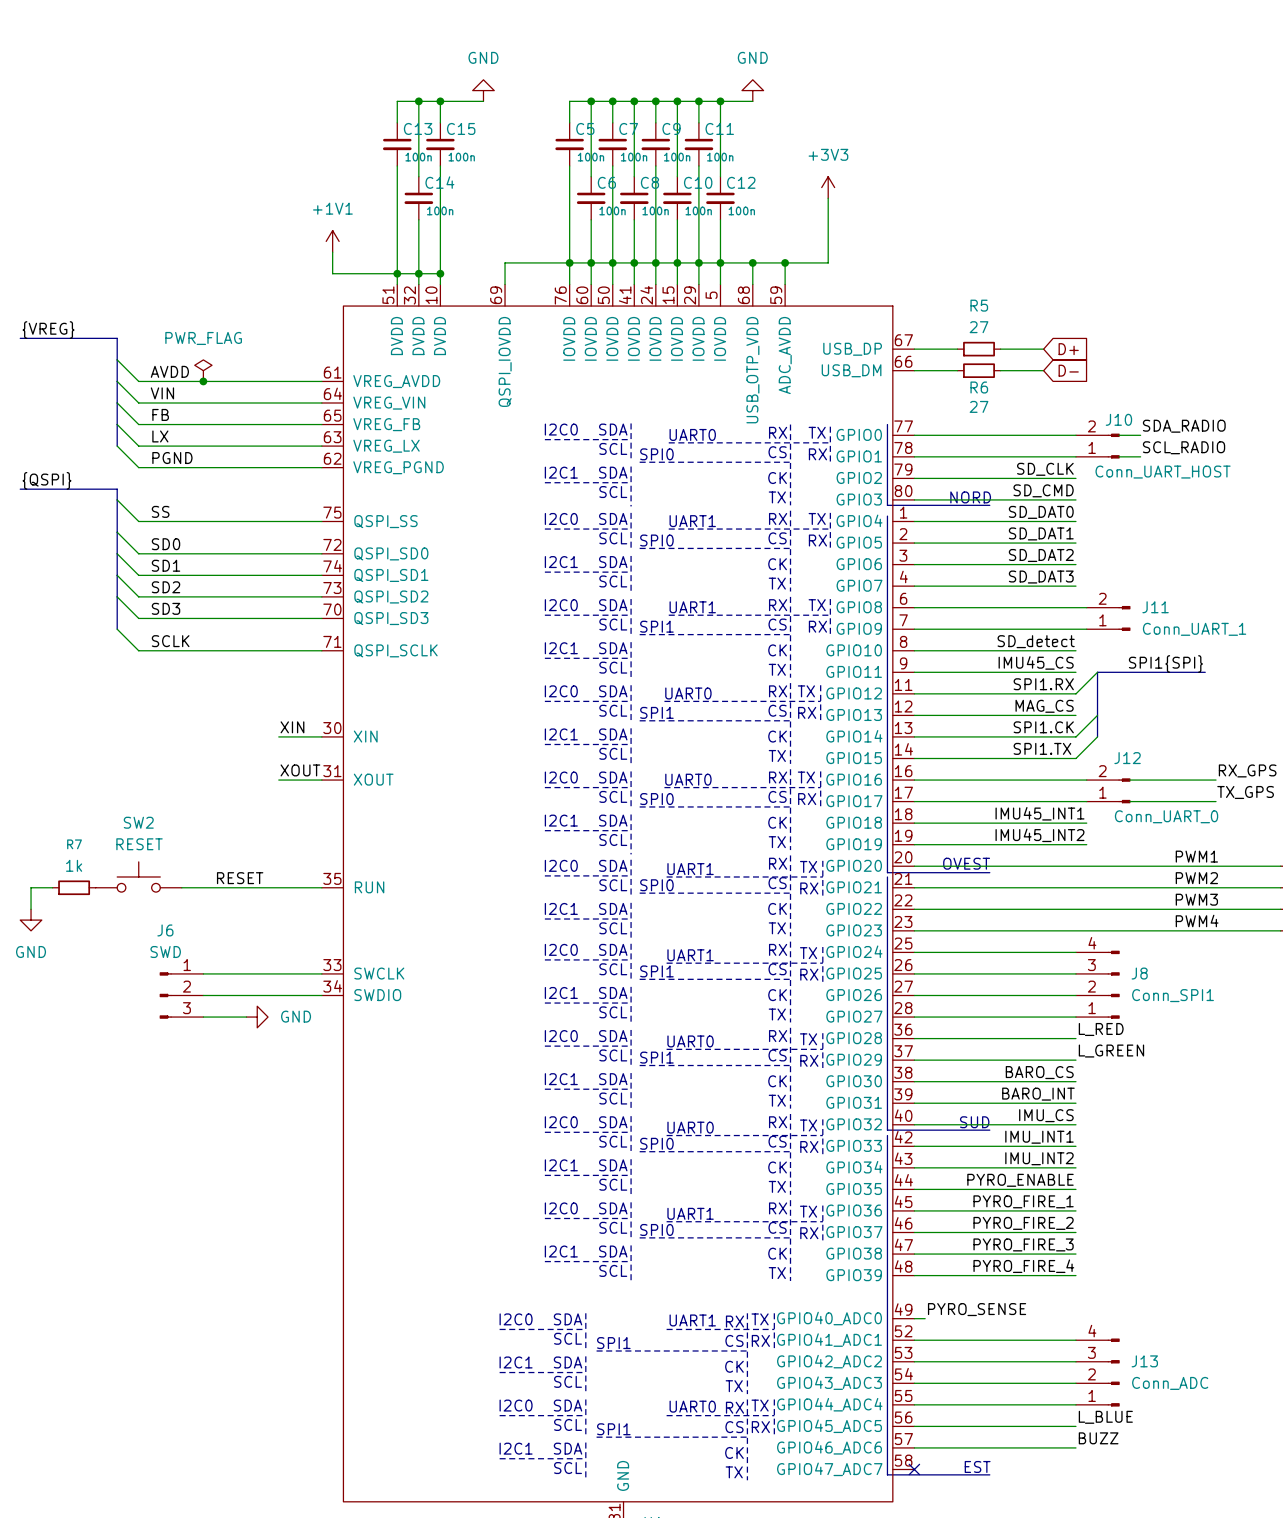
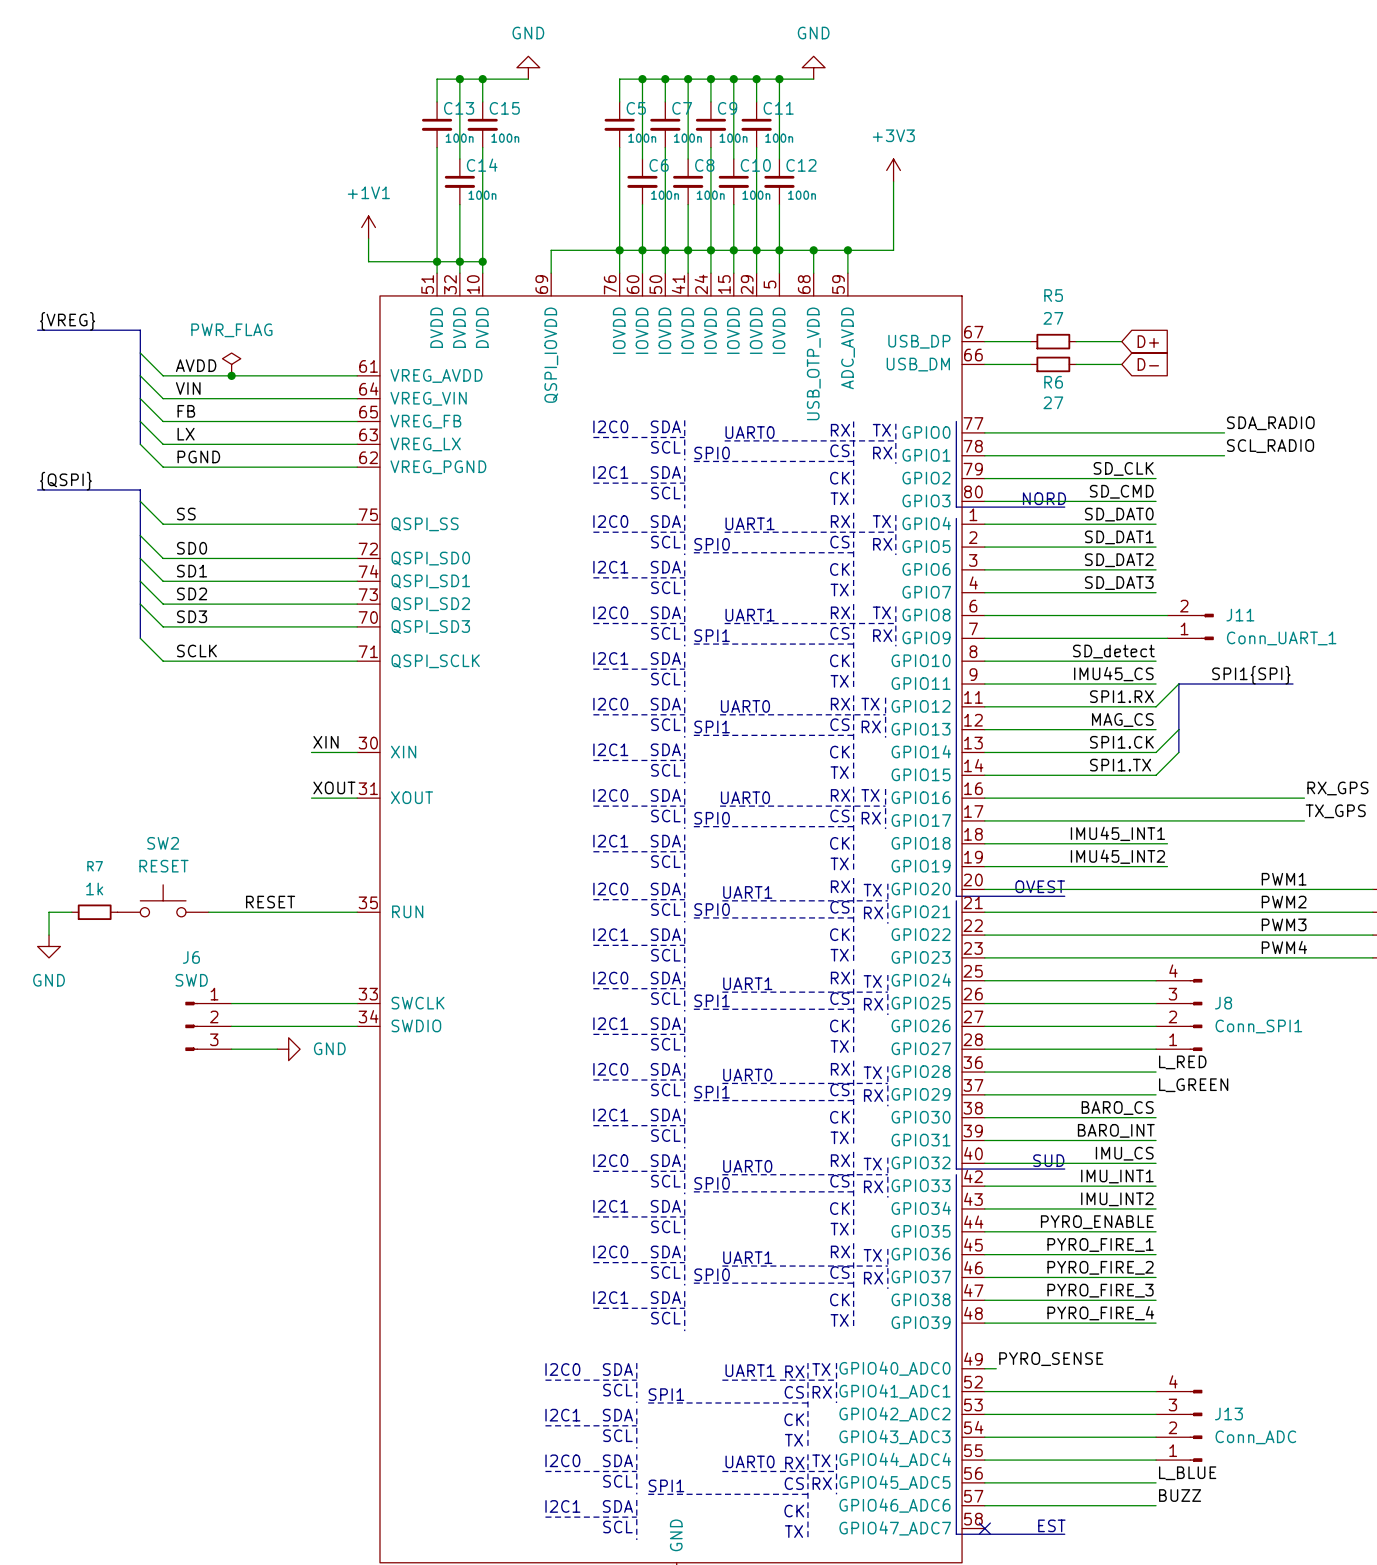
J10: Conn_UART_HOST (1097, 446) -> none
J12: Conn_UART_0 (1108, 790) -> none

